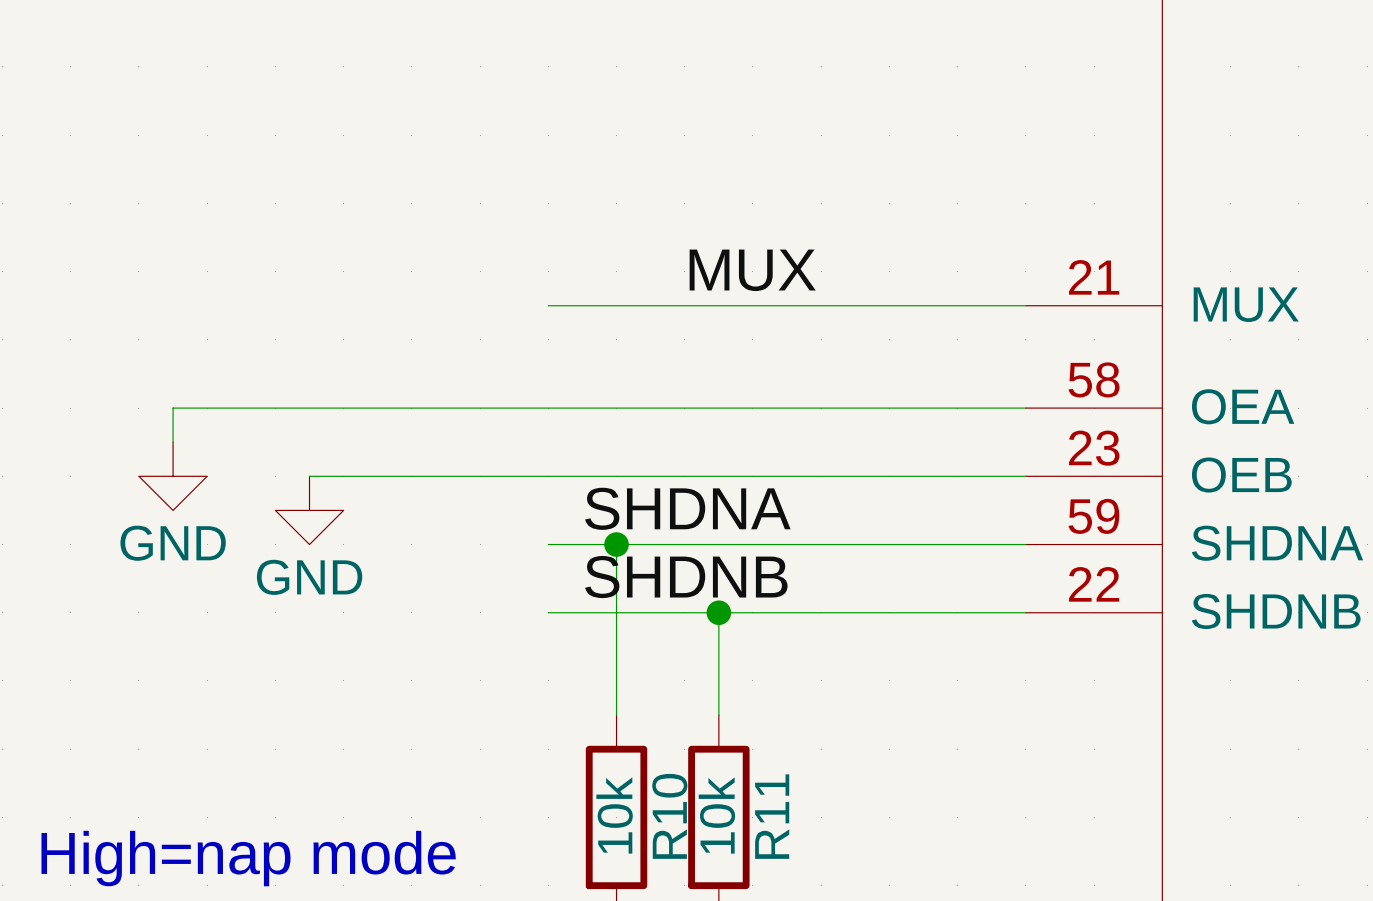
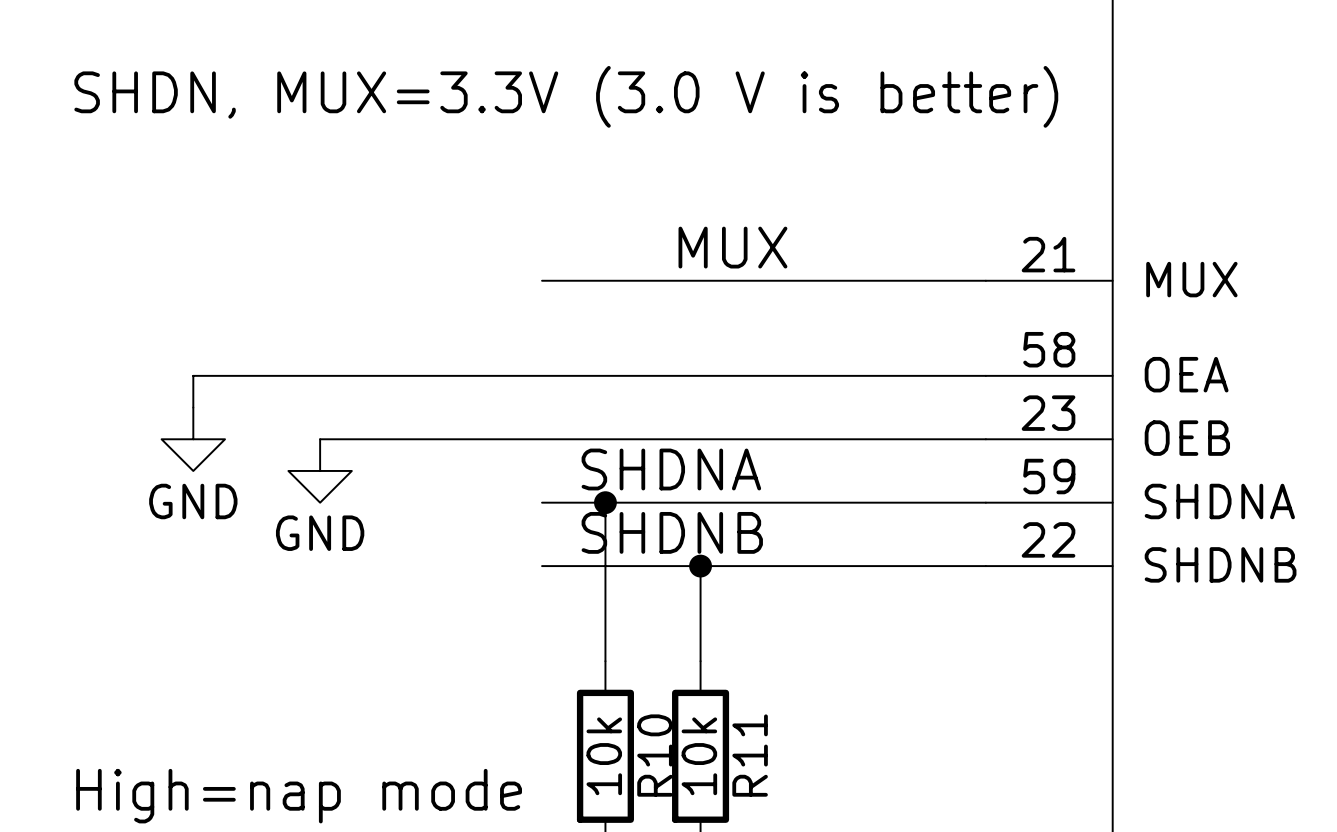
text: none -> SHDN, MUX=3.3V (3.0 V is better) (566, 96)

